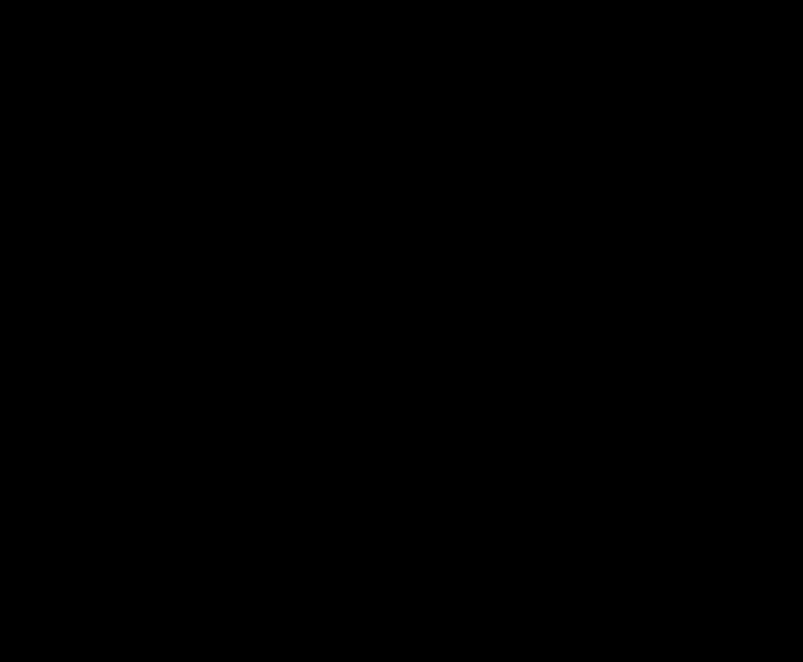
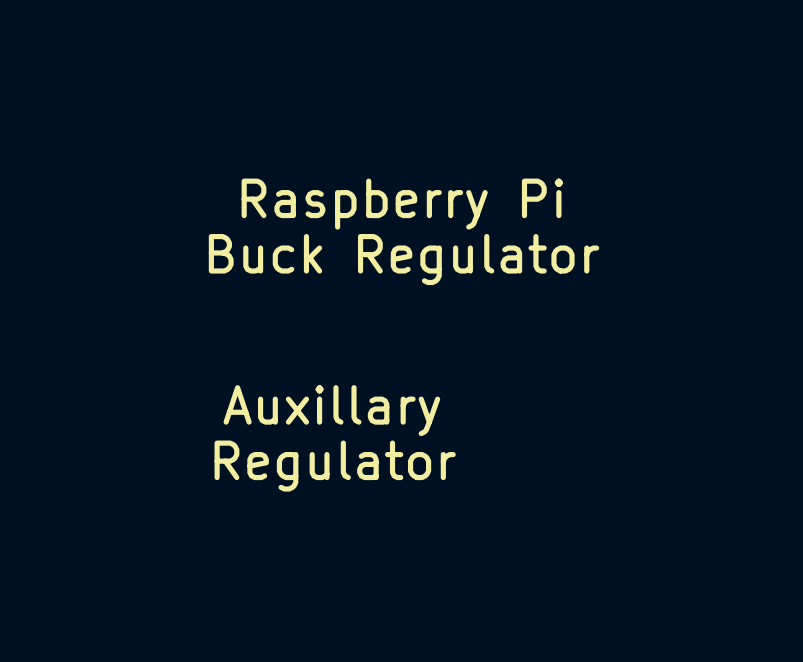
text: none -> Raspberry Pi (402, 204)
text: none -> Buck Regulator (403, 259)
text: none -> Auxillary (331, 410)
text: none -> Regulator (335, 466)

